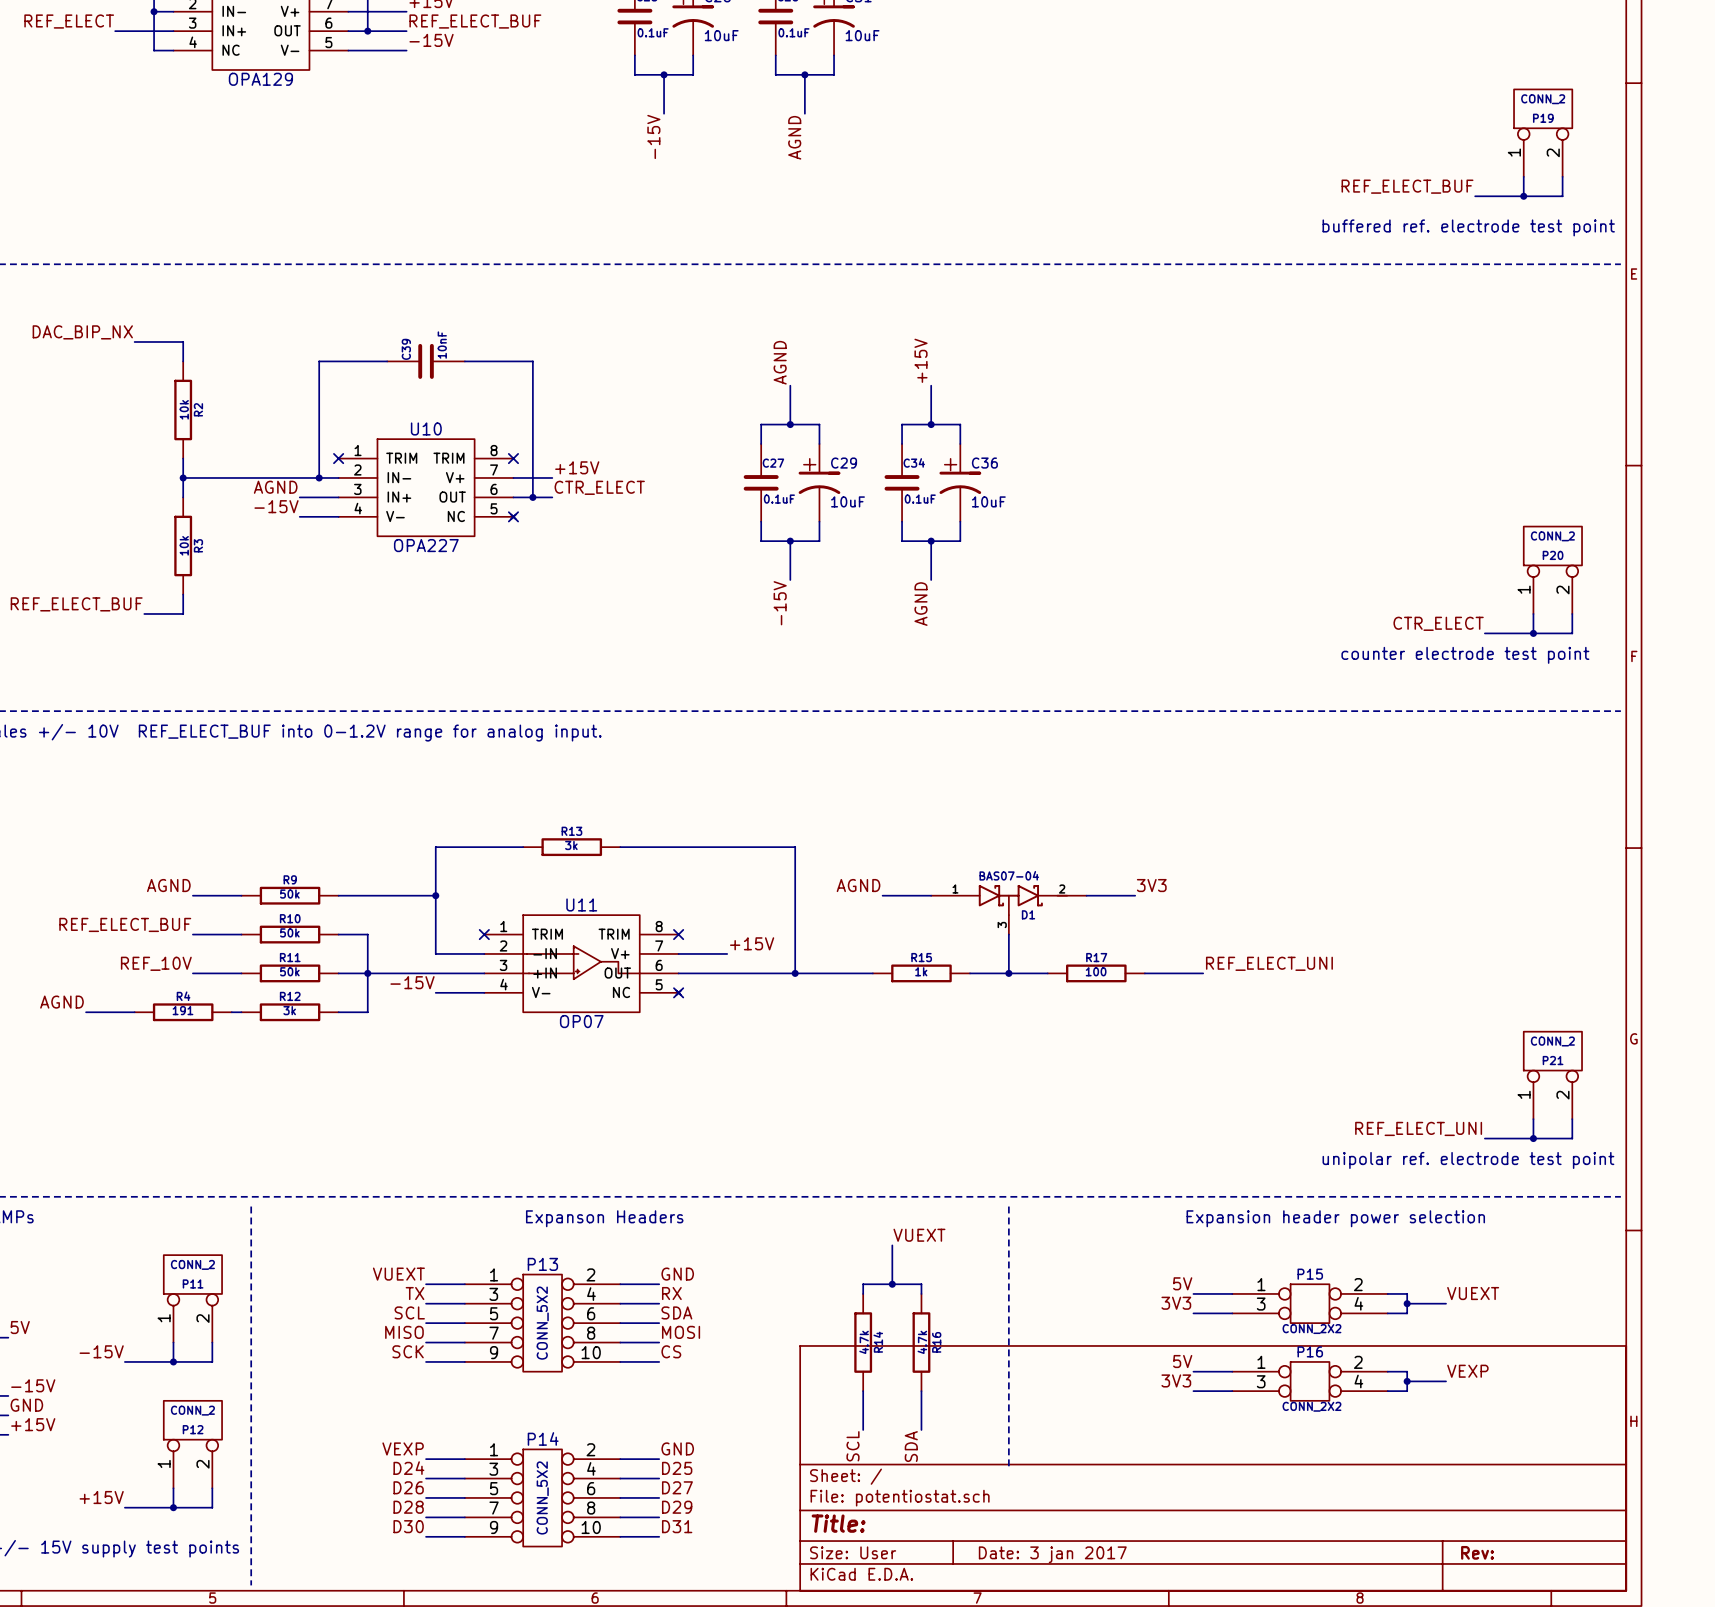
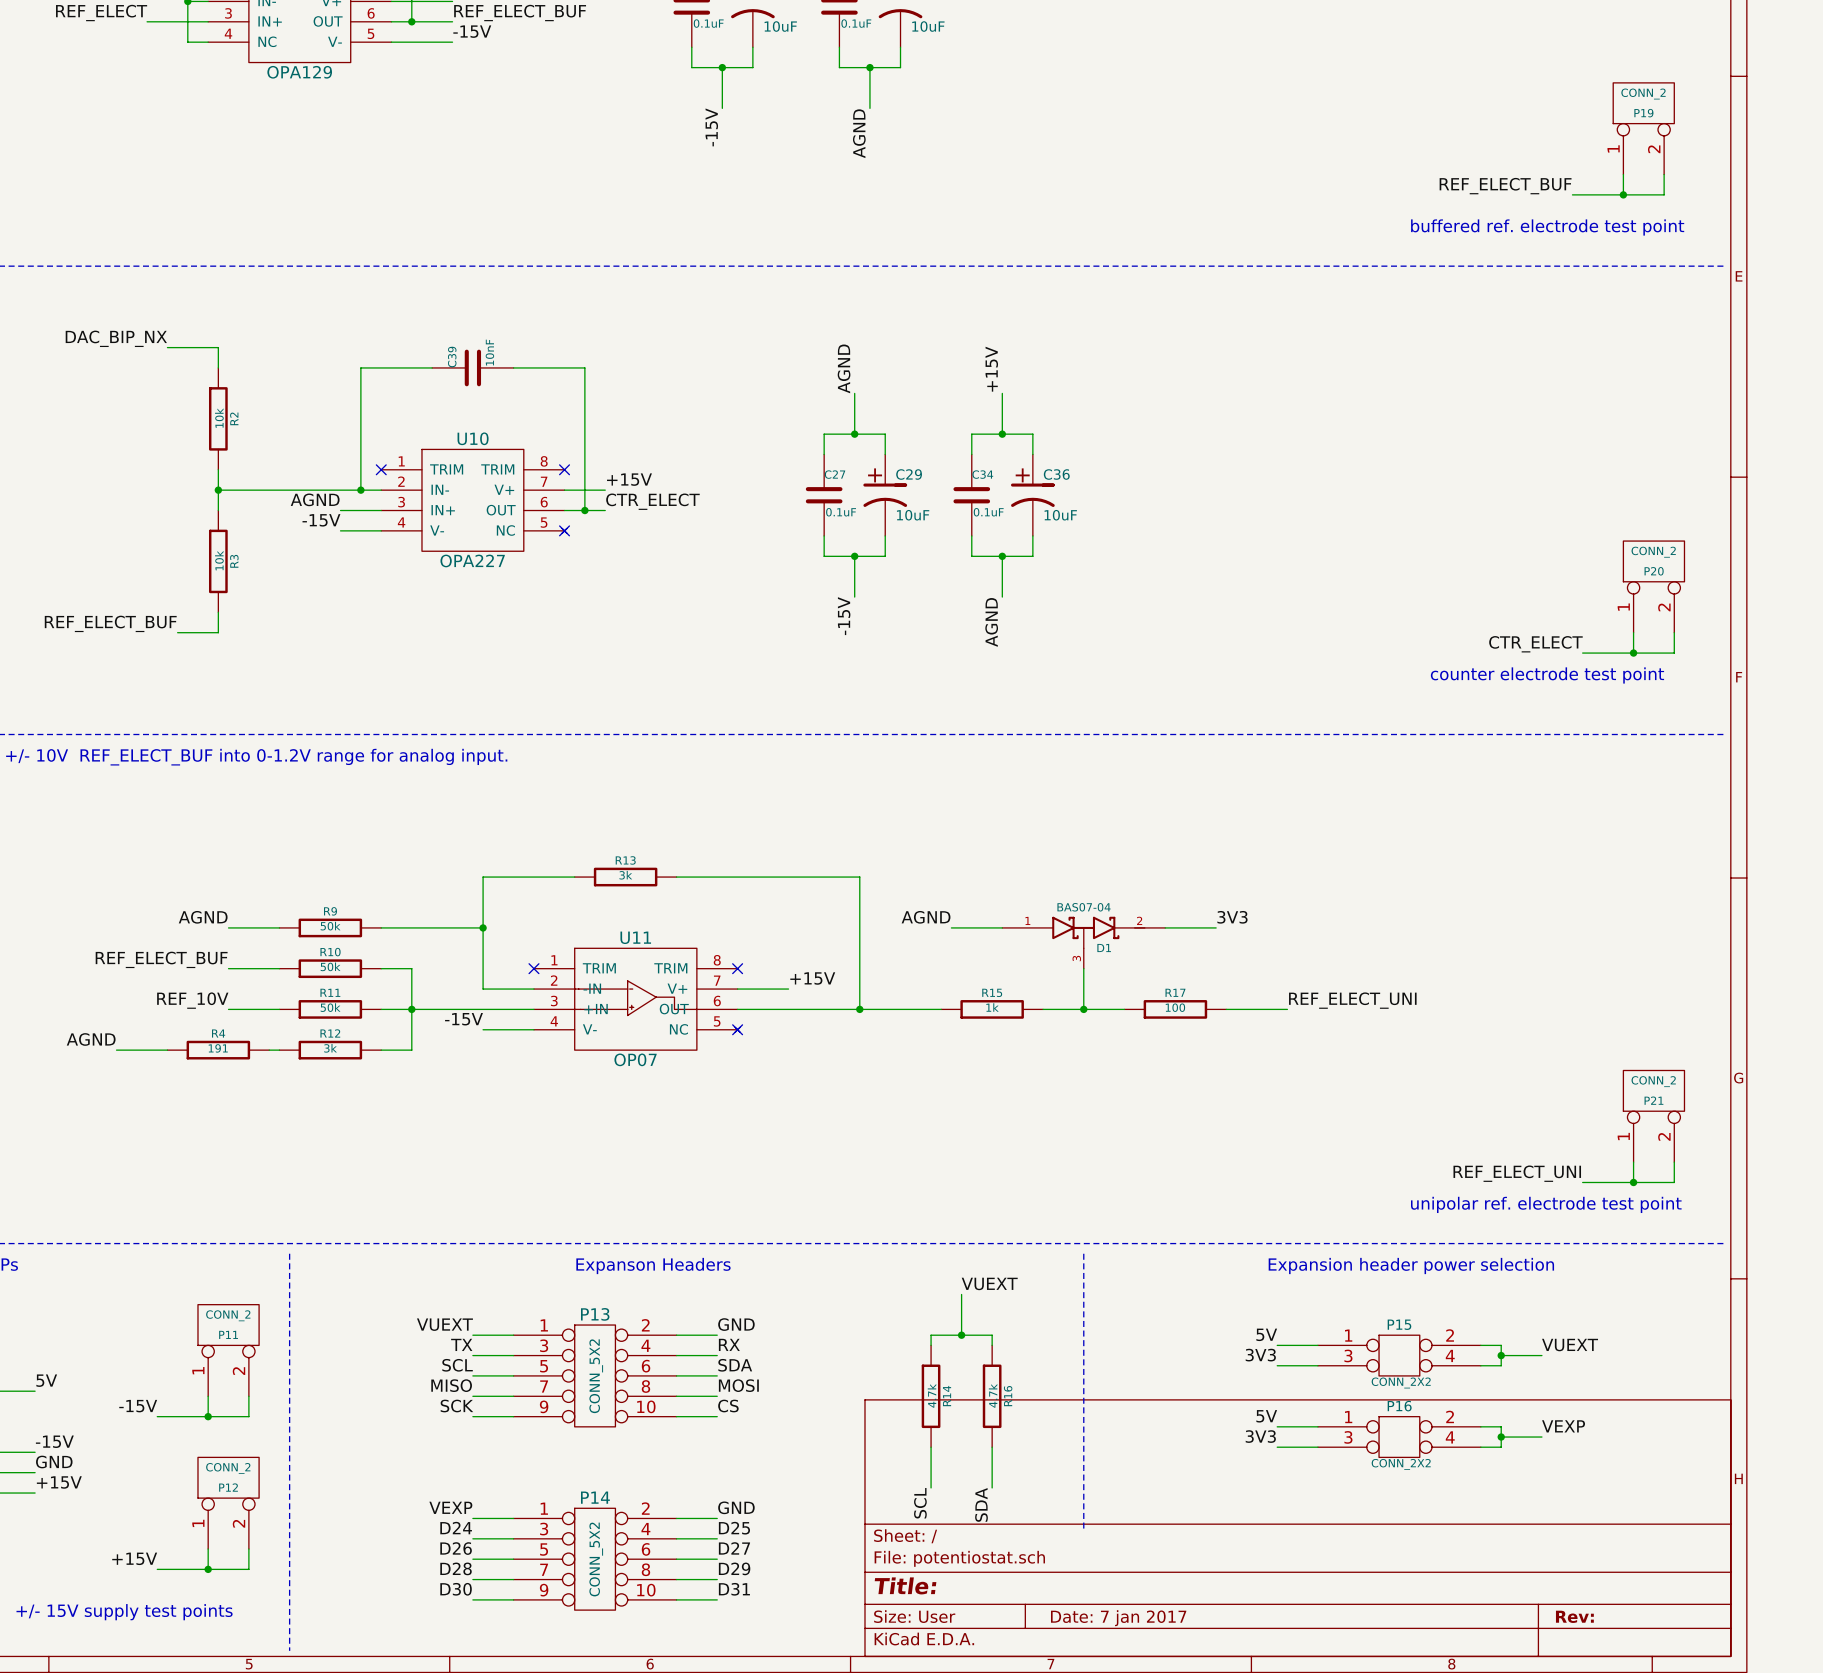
title block: Date: 3 jan 2017 (1052, 1554) -> Date: 7 jan 2017 (1118, 1618)

